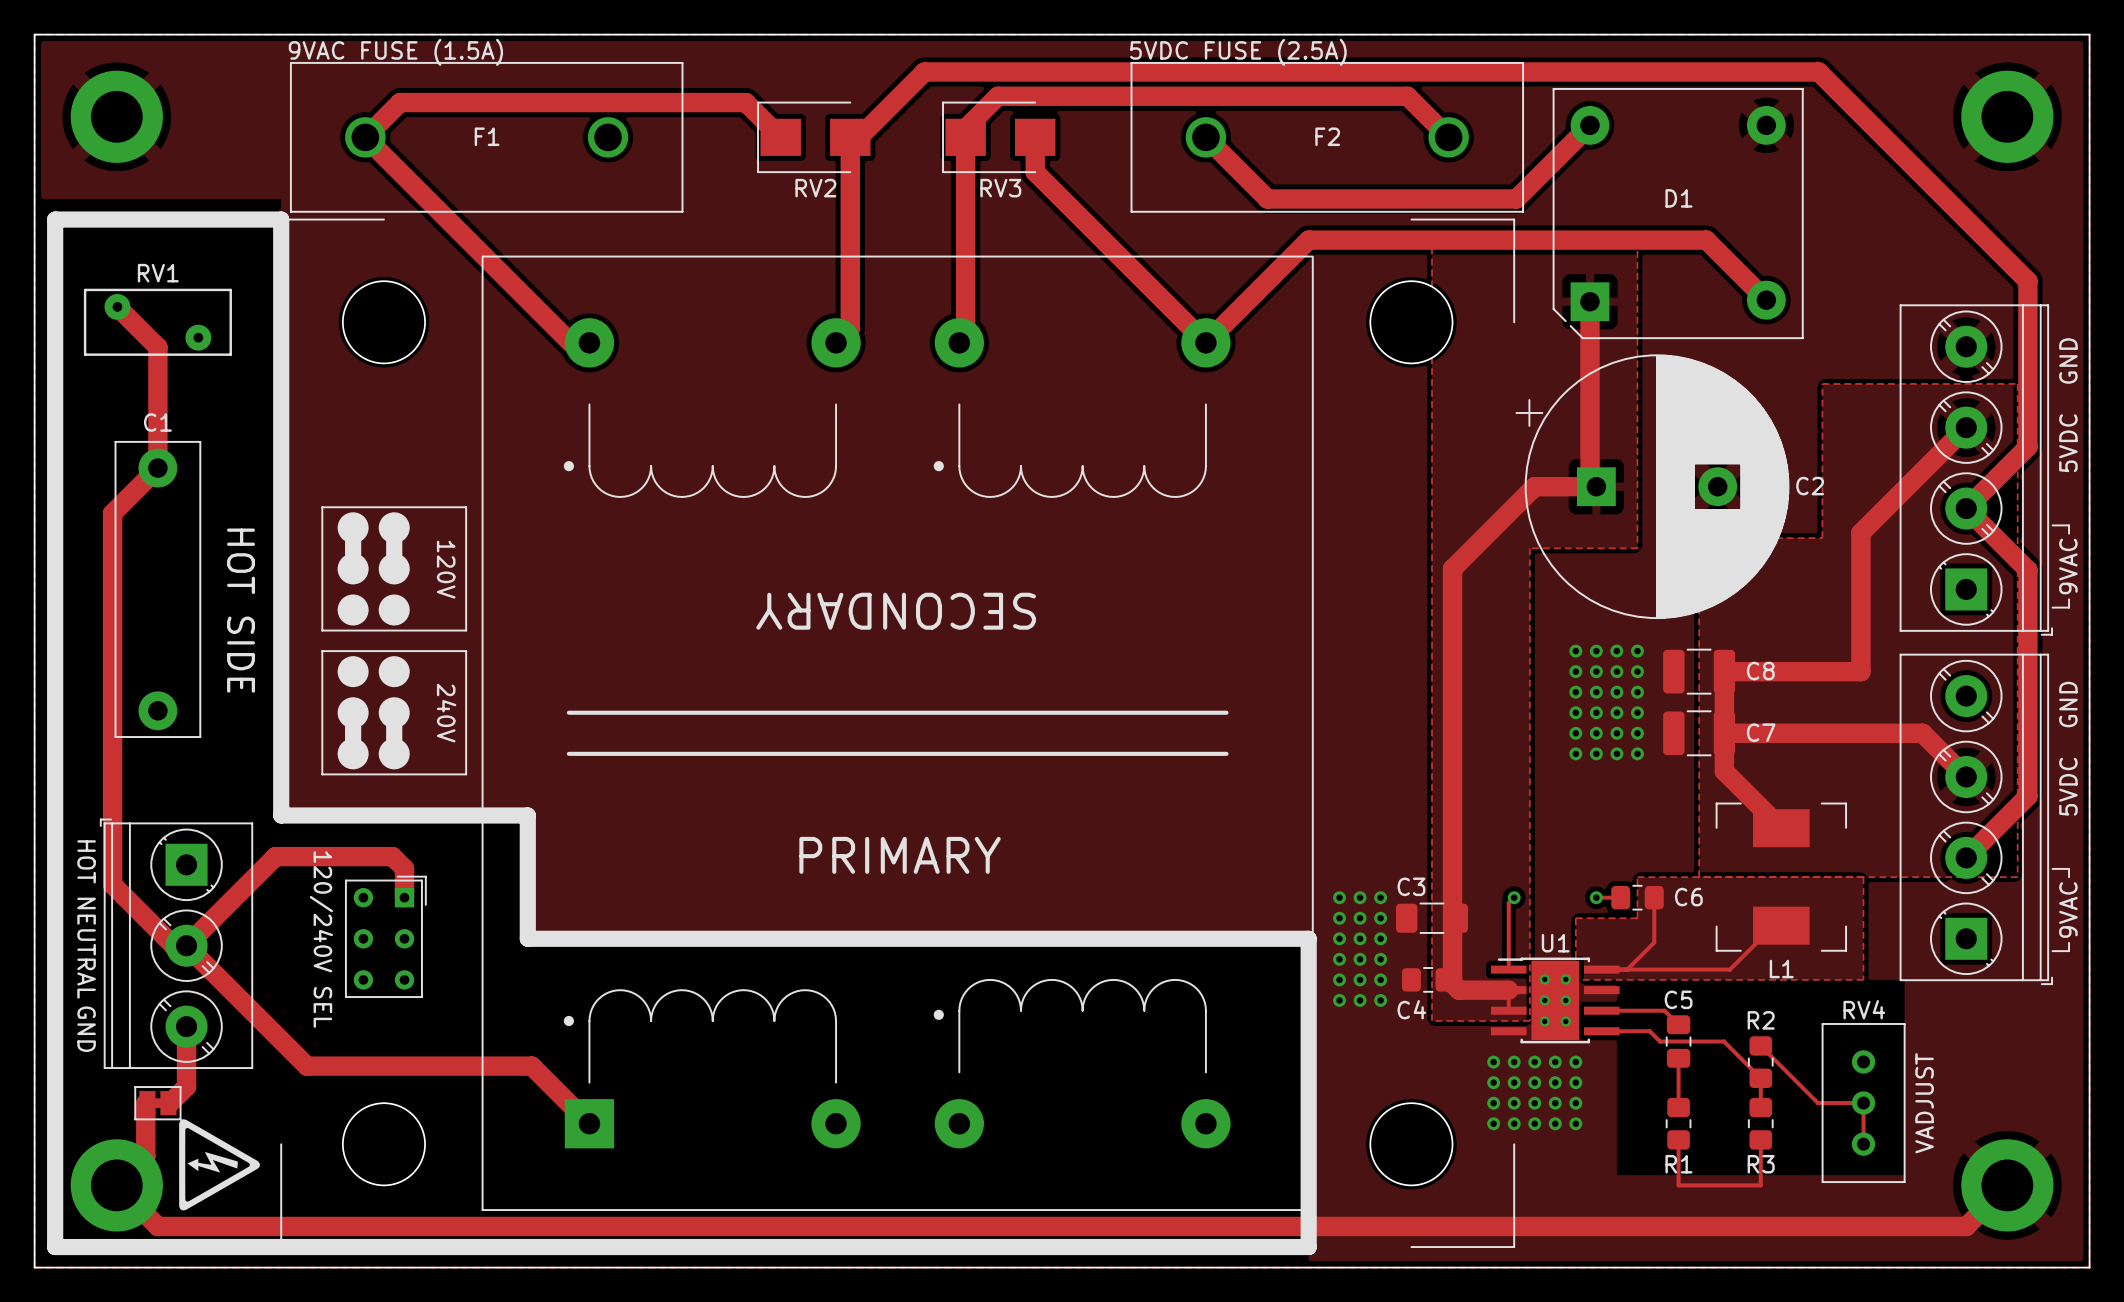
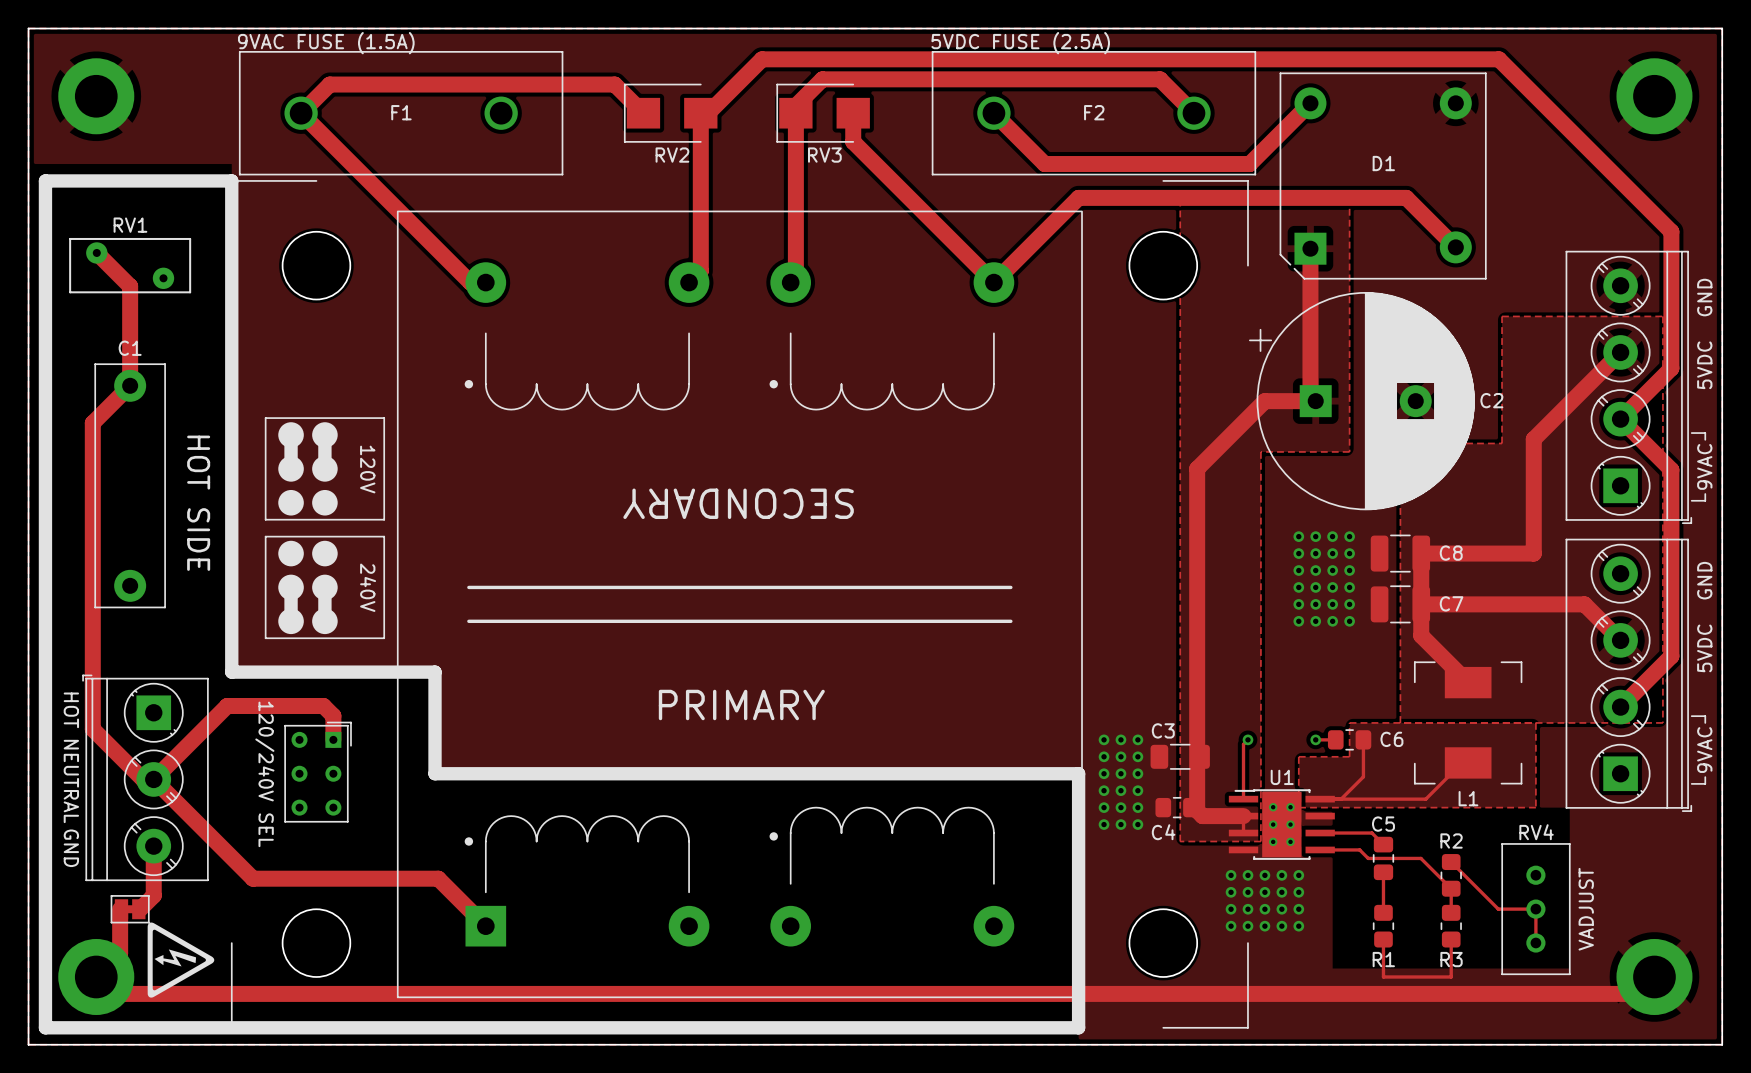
track: (137, 1205) (157, 1226) (1966, 1226) (1986, 1205) -> (113, 993) (1637, 993)

